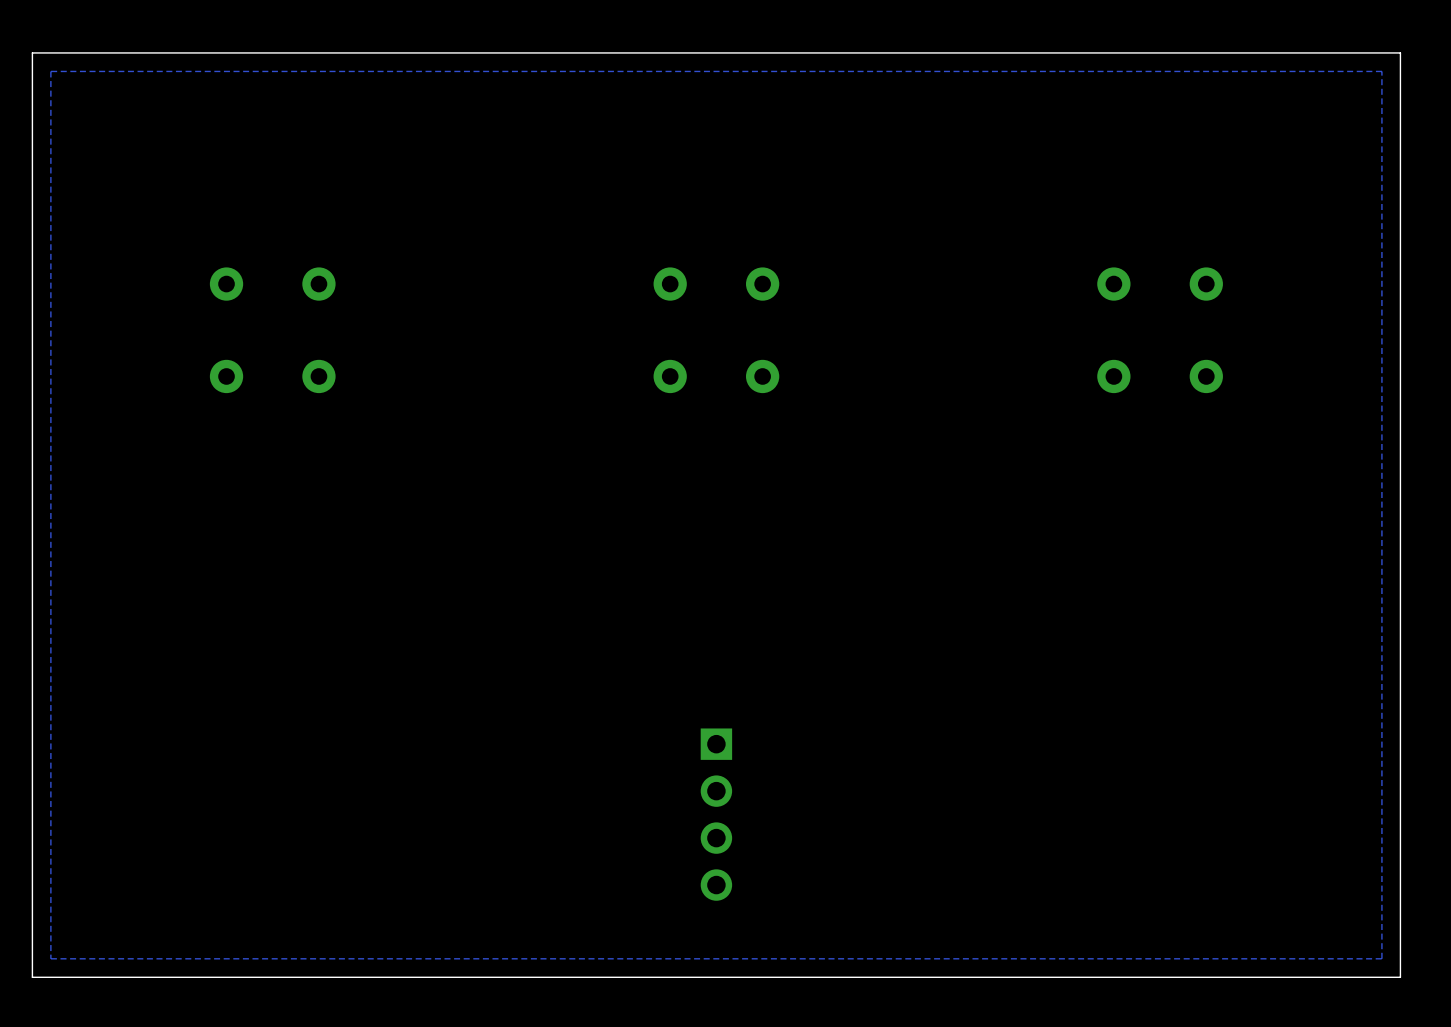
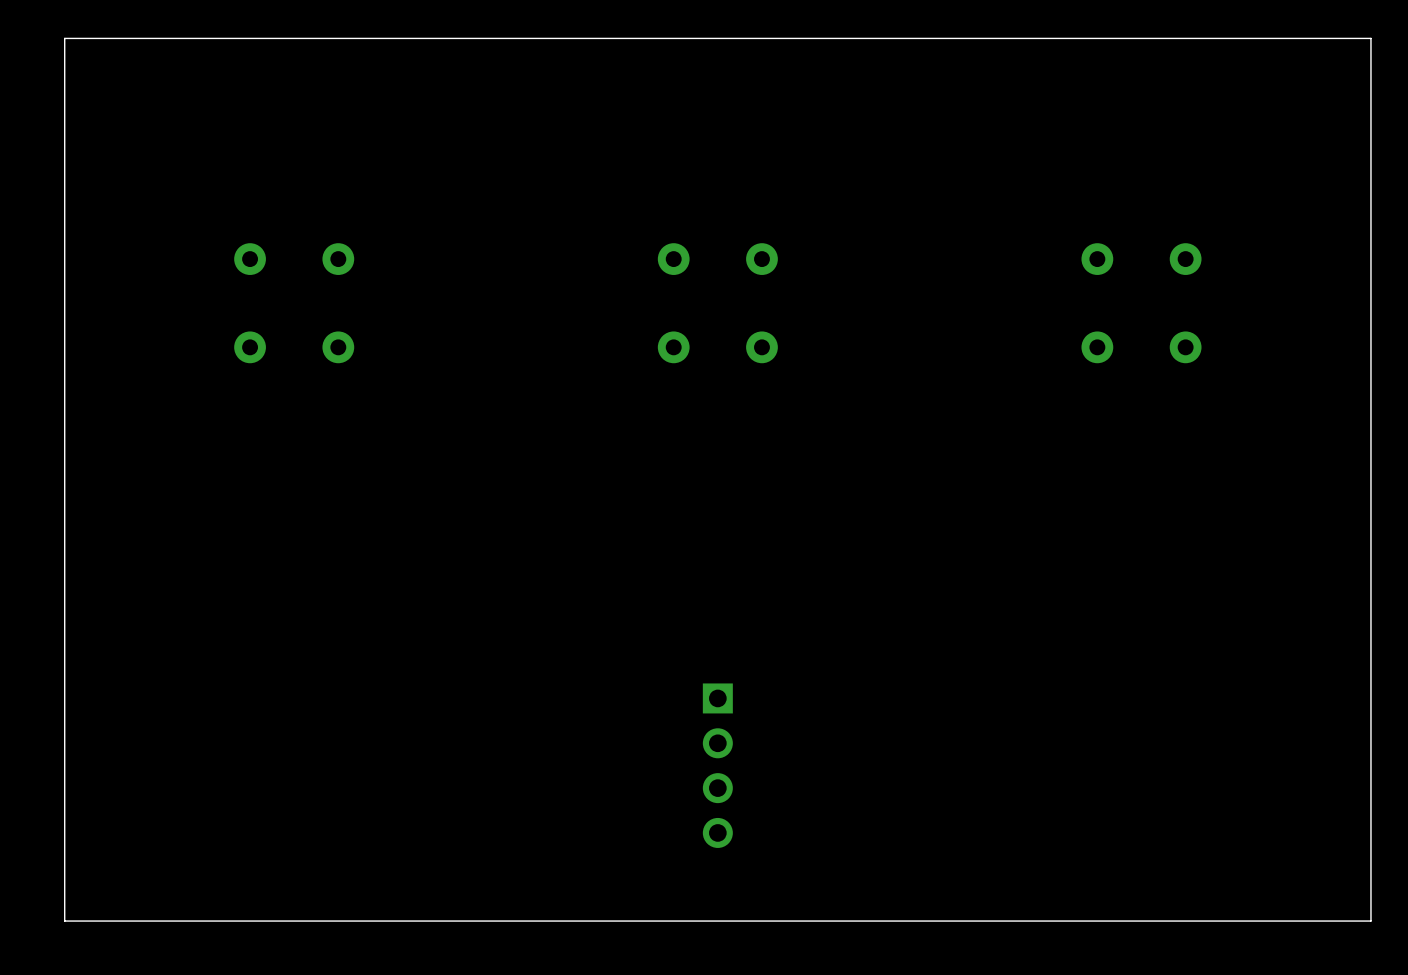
zone outline: (1381, 71) (50, 71) (50, 958) (1381, 958) (1381, 71) -> none

